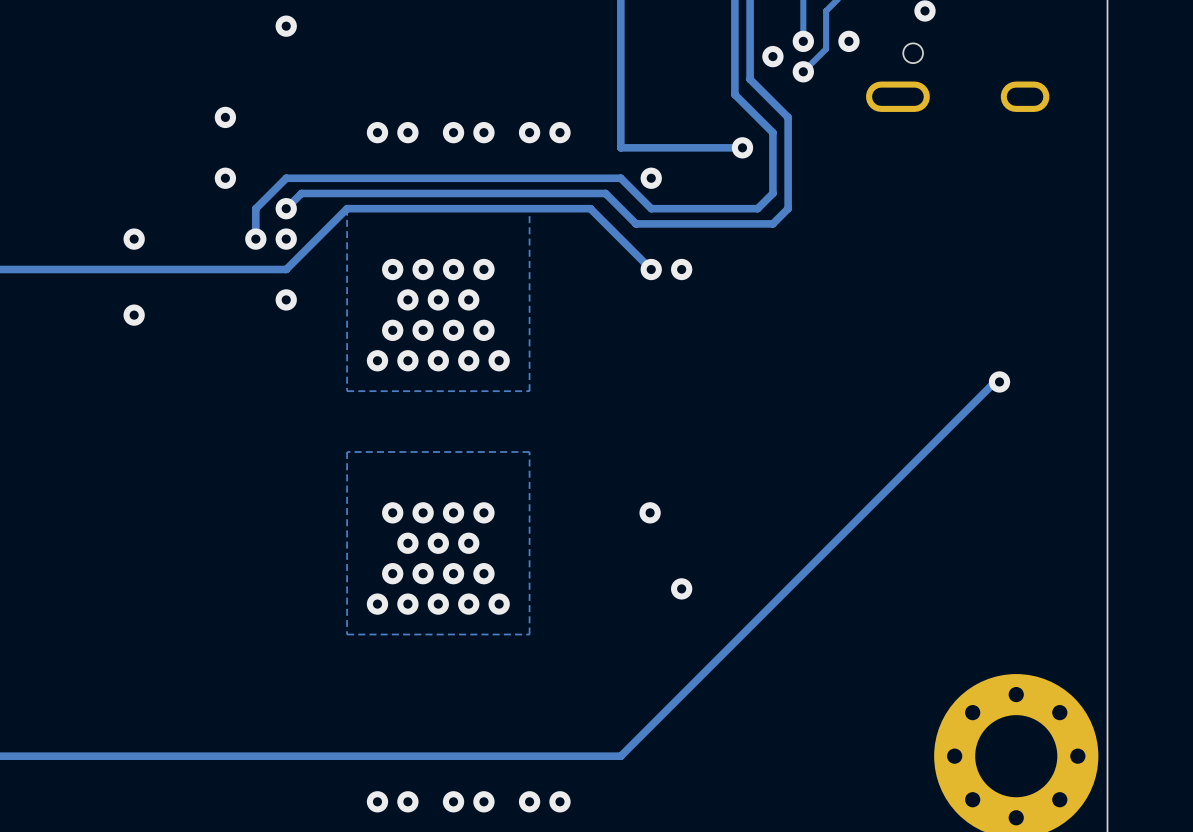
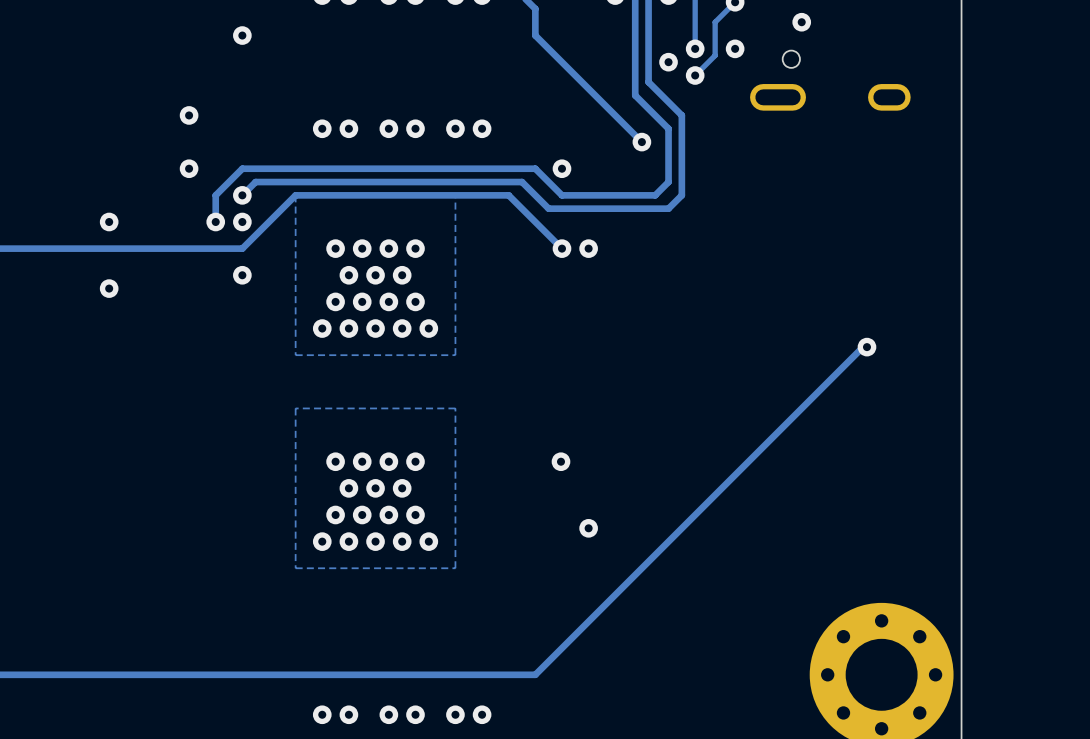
track: (620, 26) (620, 147) (742, 147) -> (535, 35) (641, 142)

